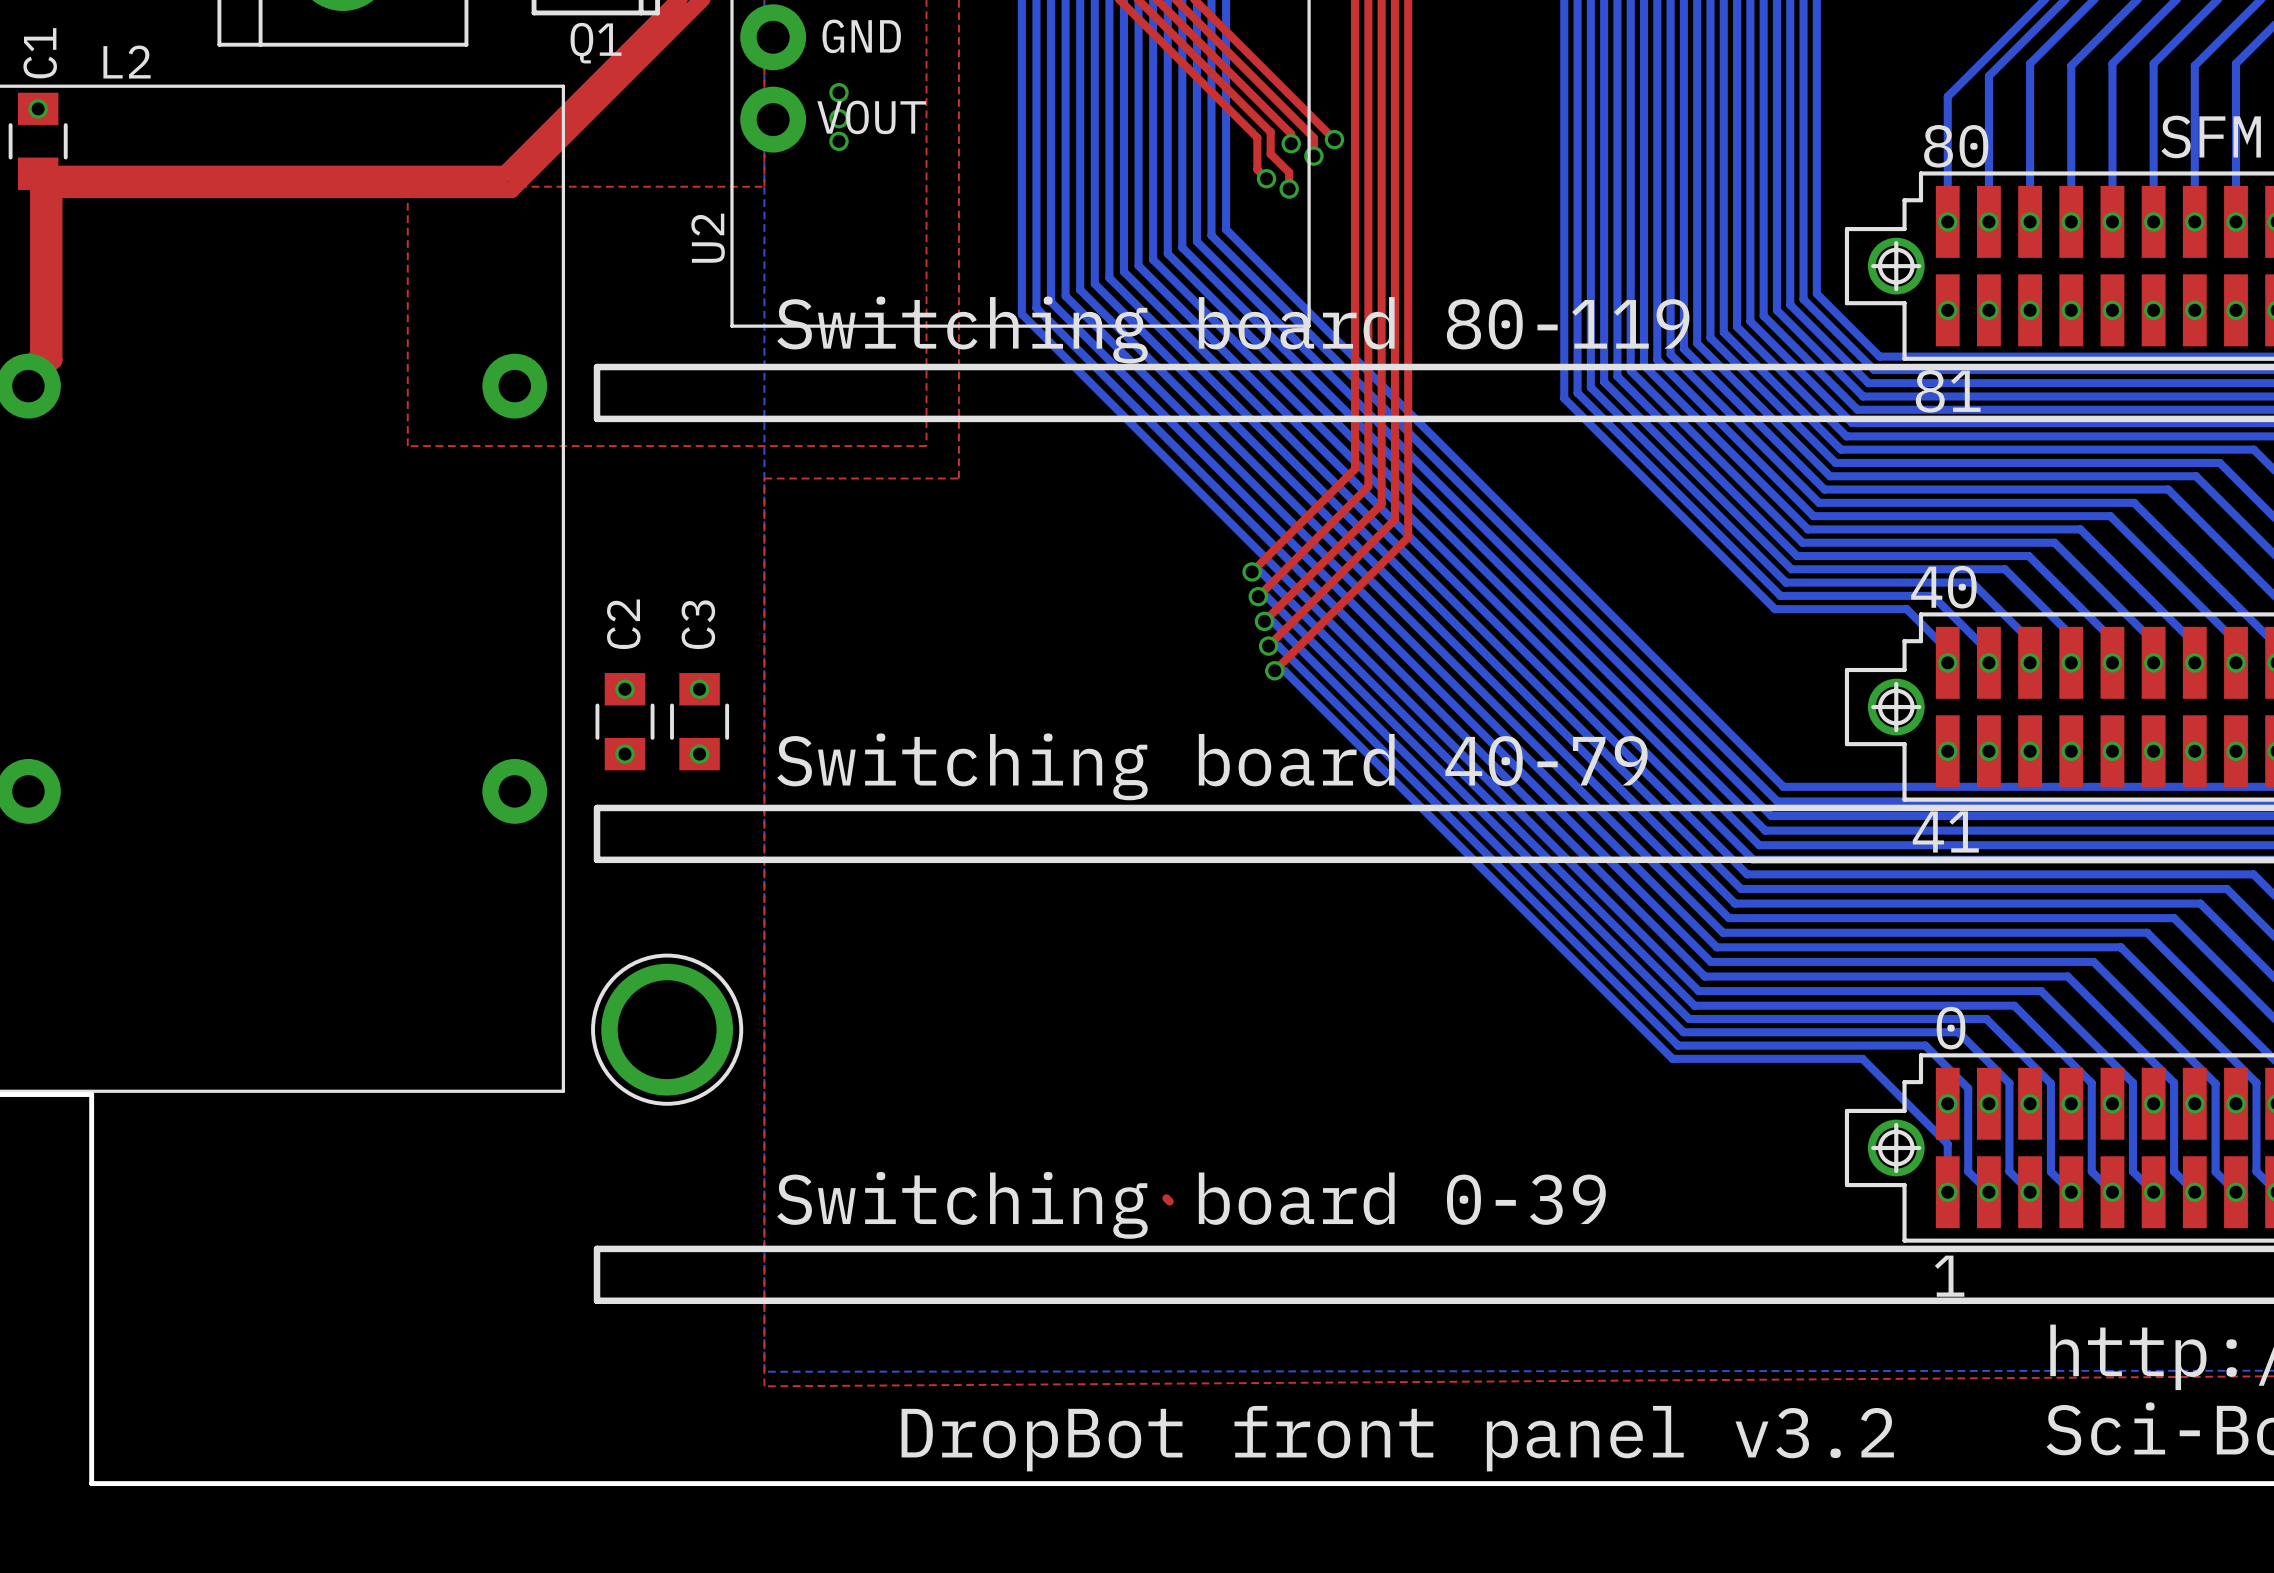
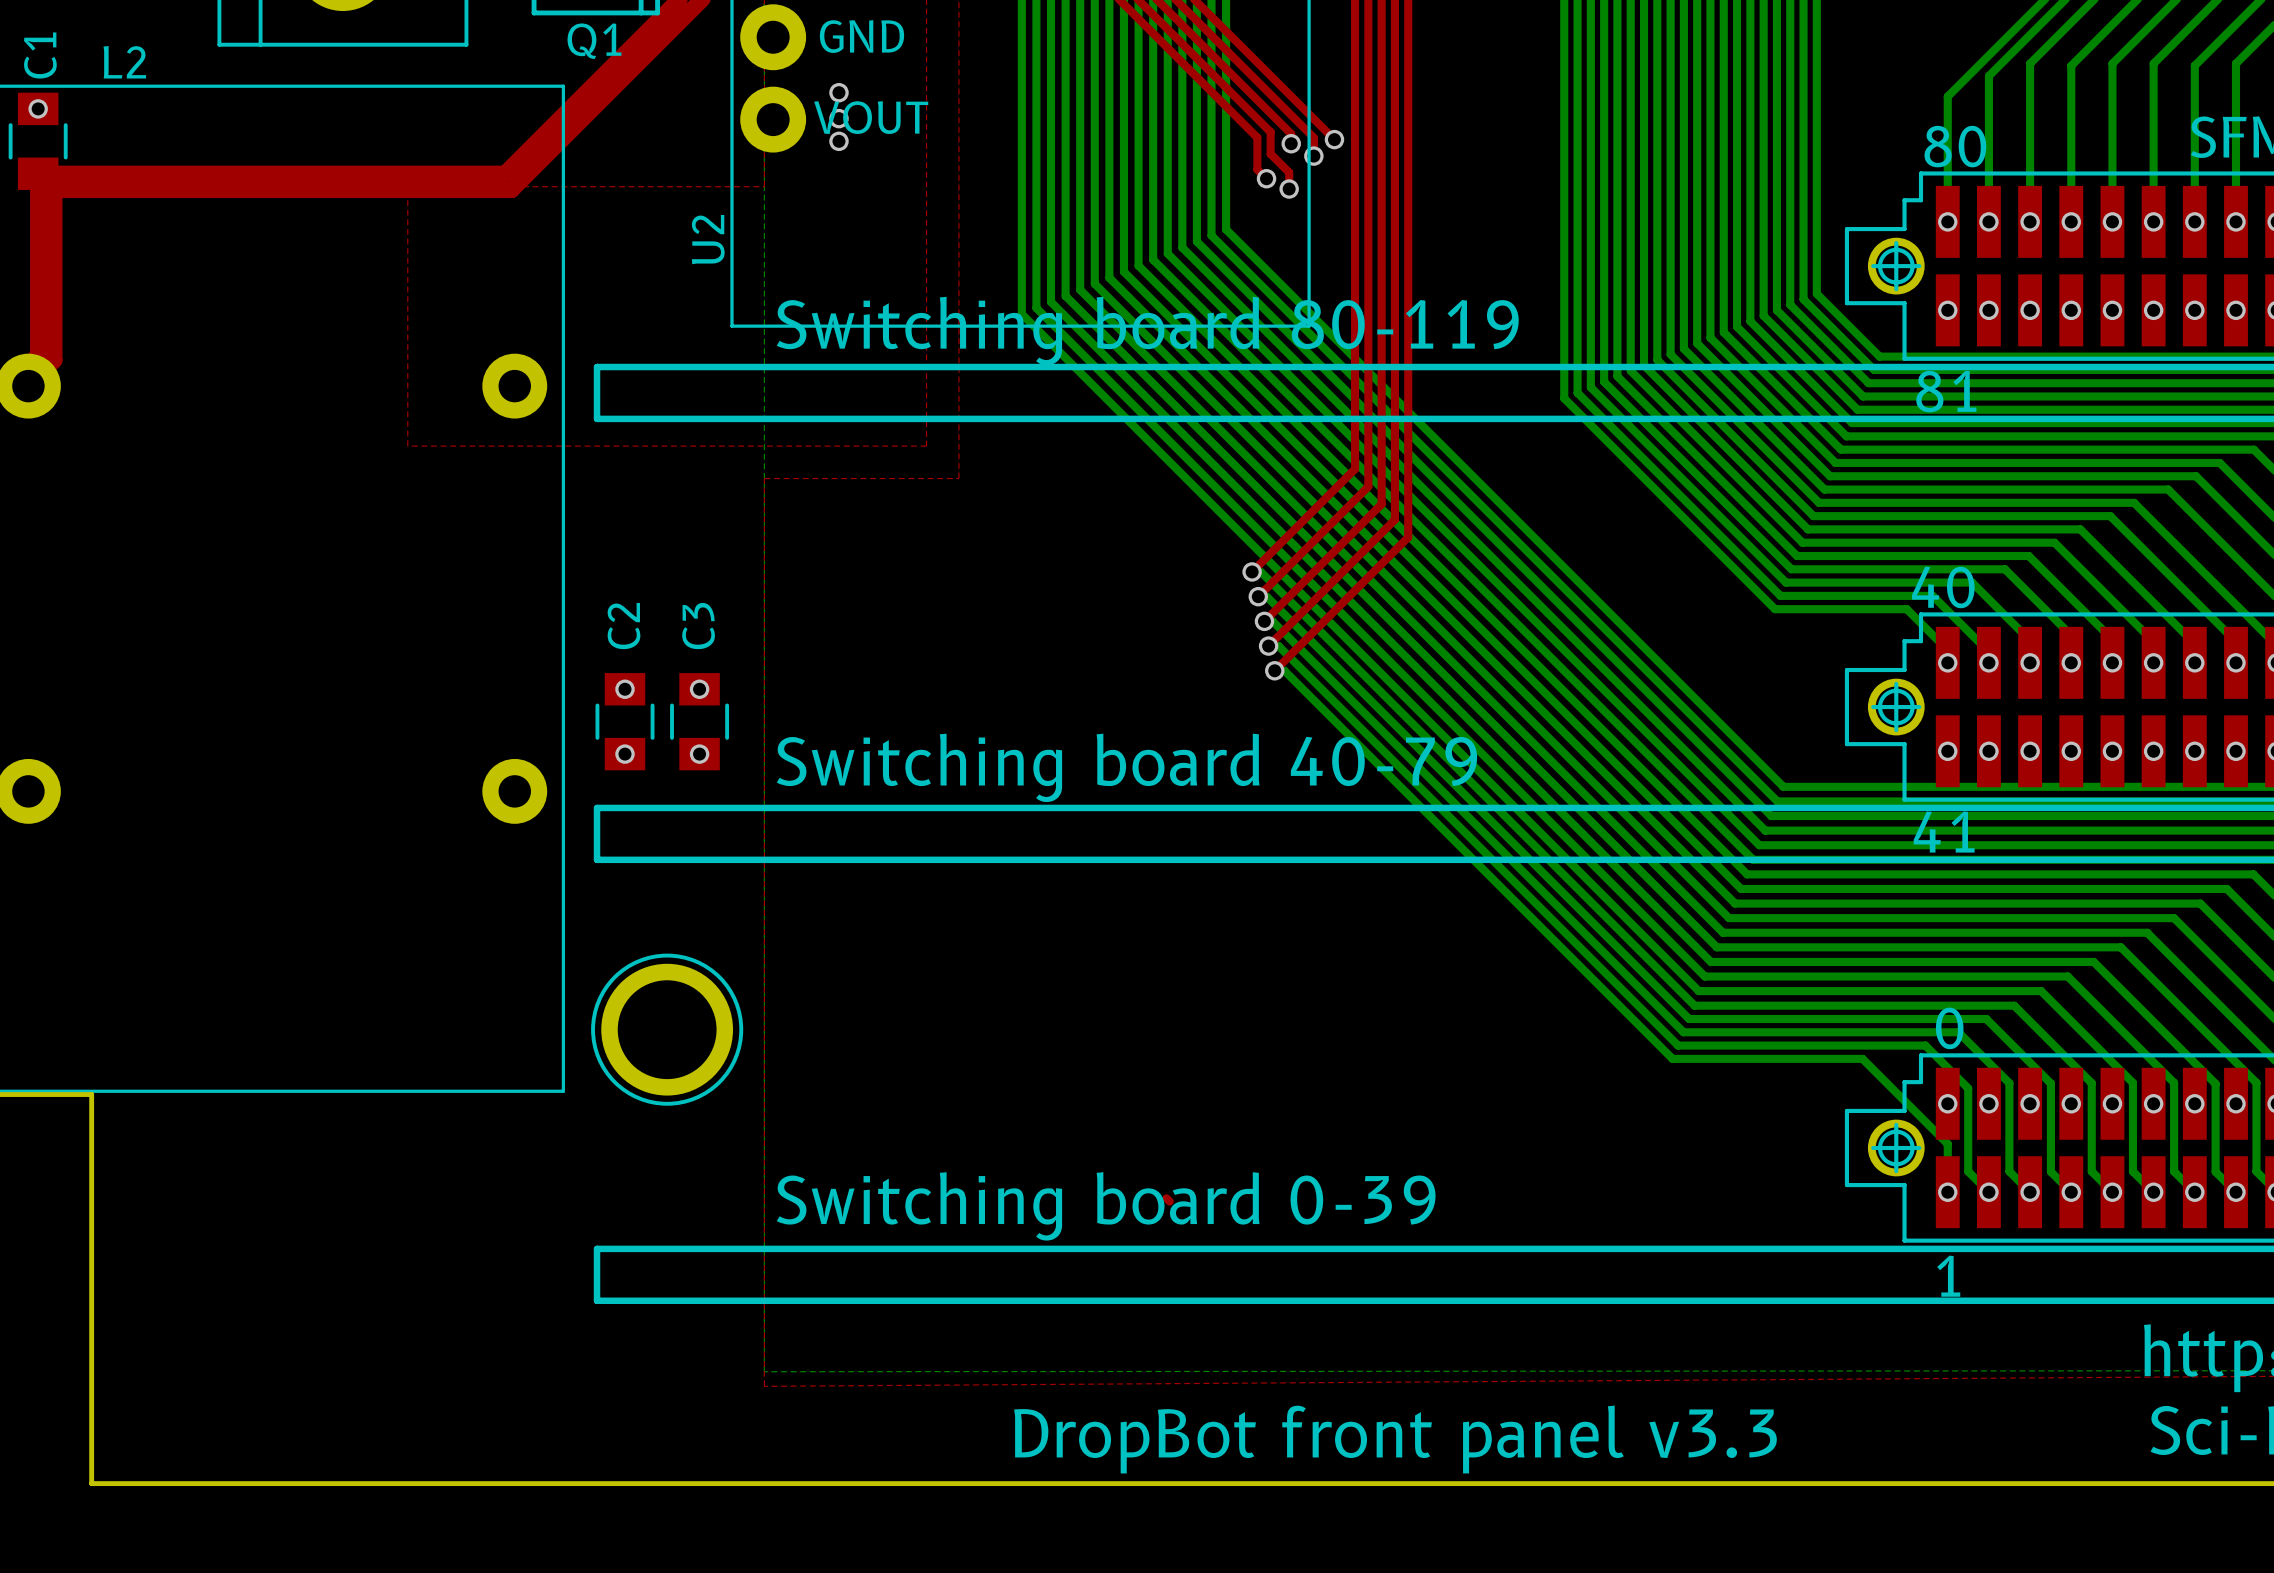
text: DropBot front panel v3.2 (1397, 1438) -> DropBot front panel v3.3 (1395, 1439)

